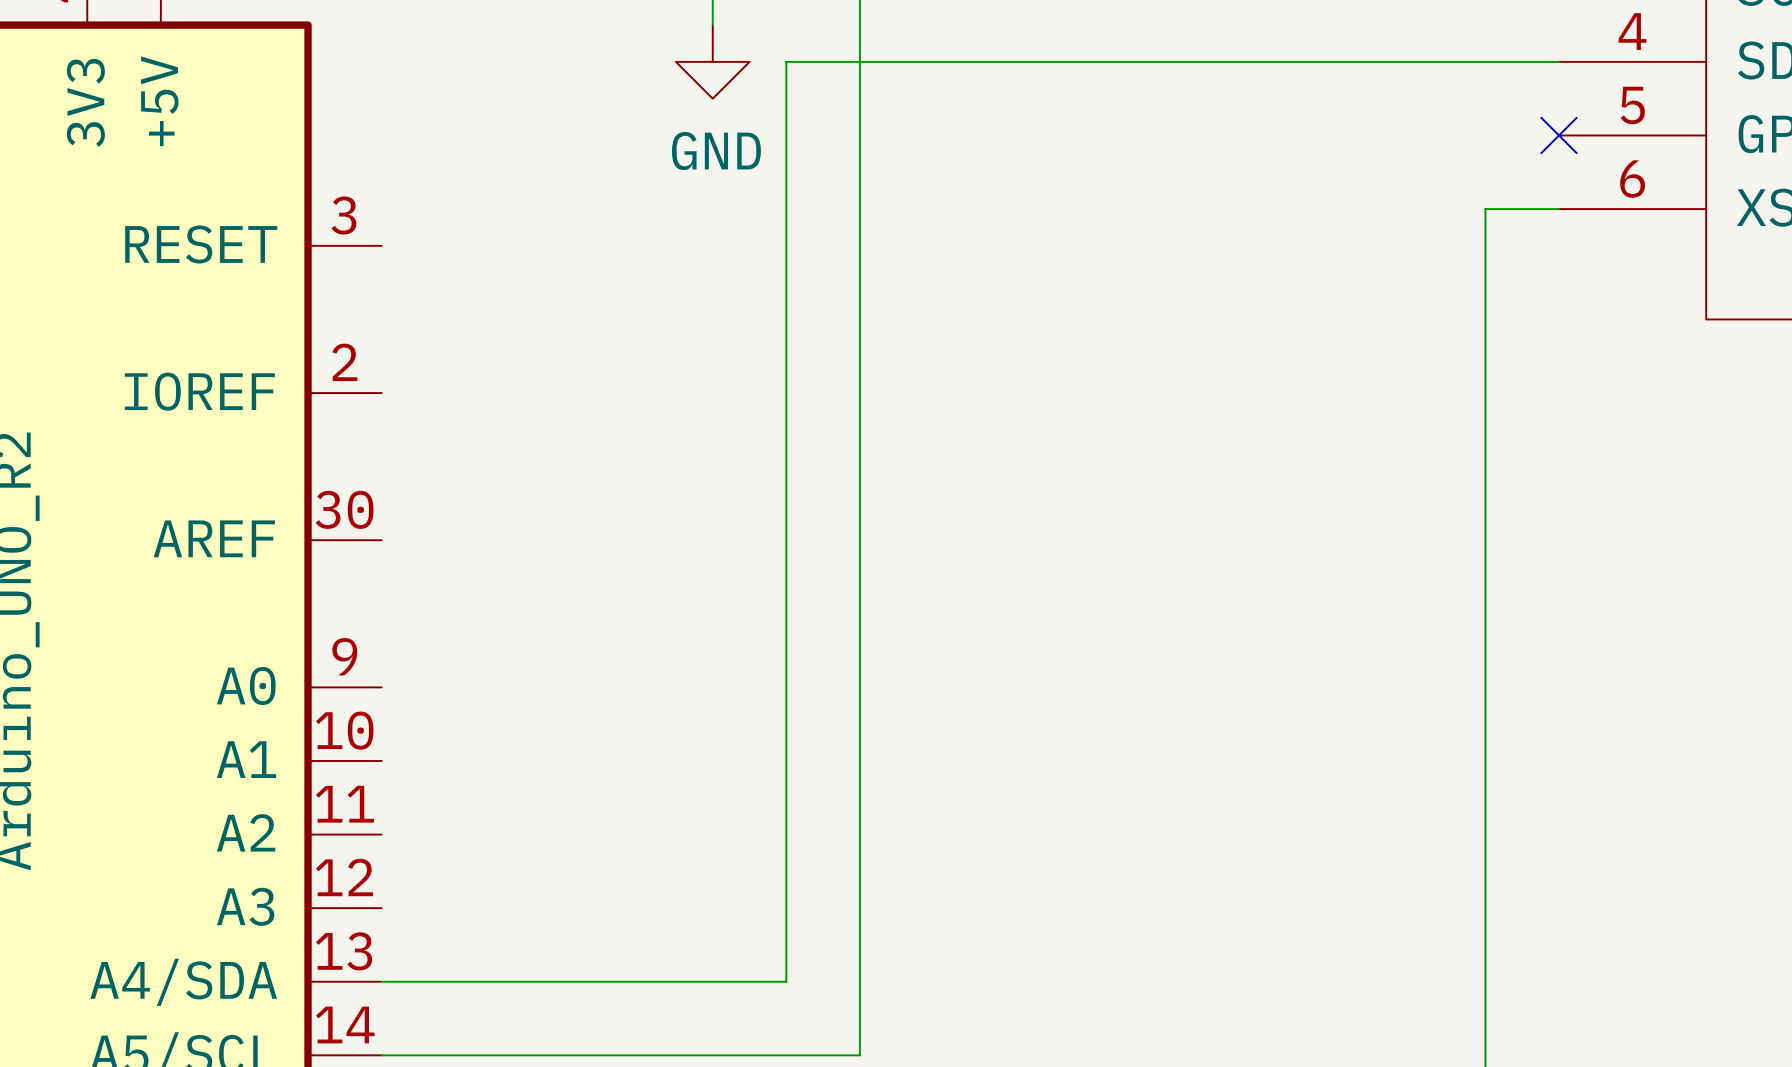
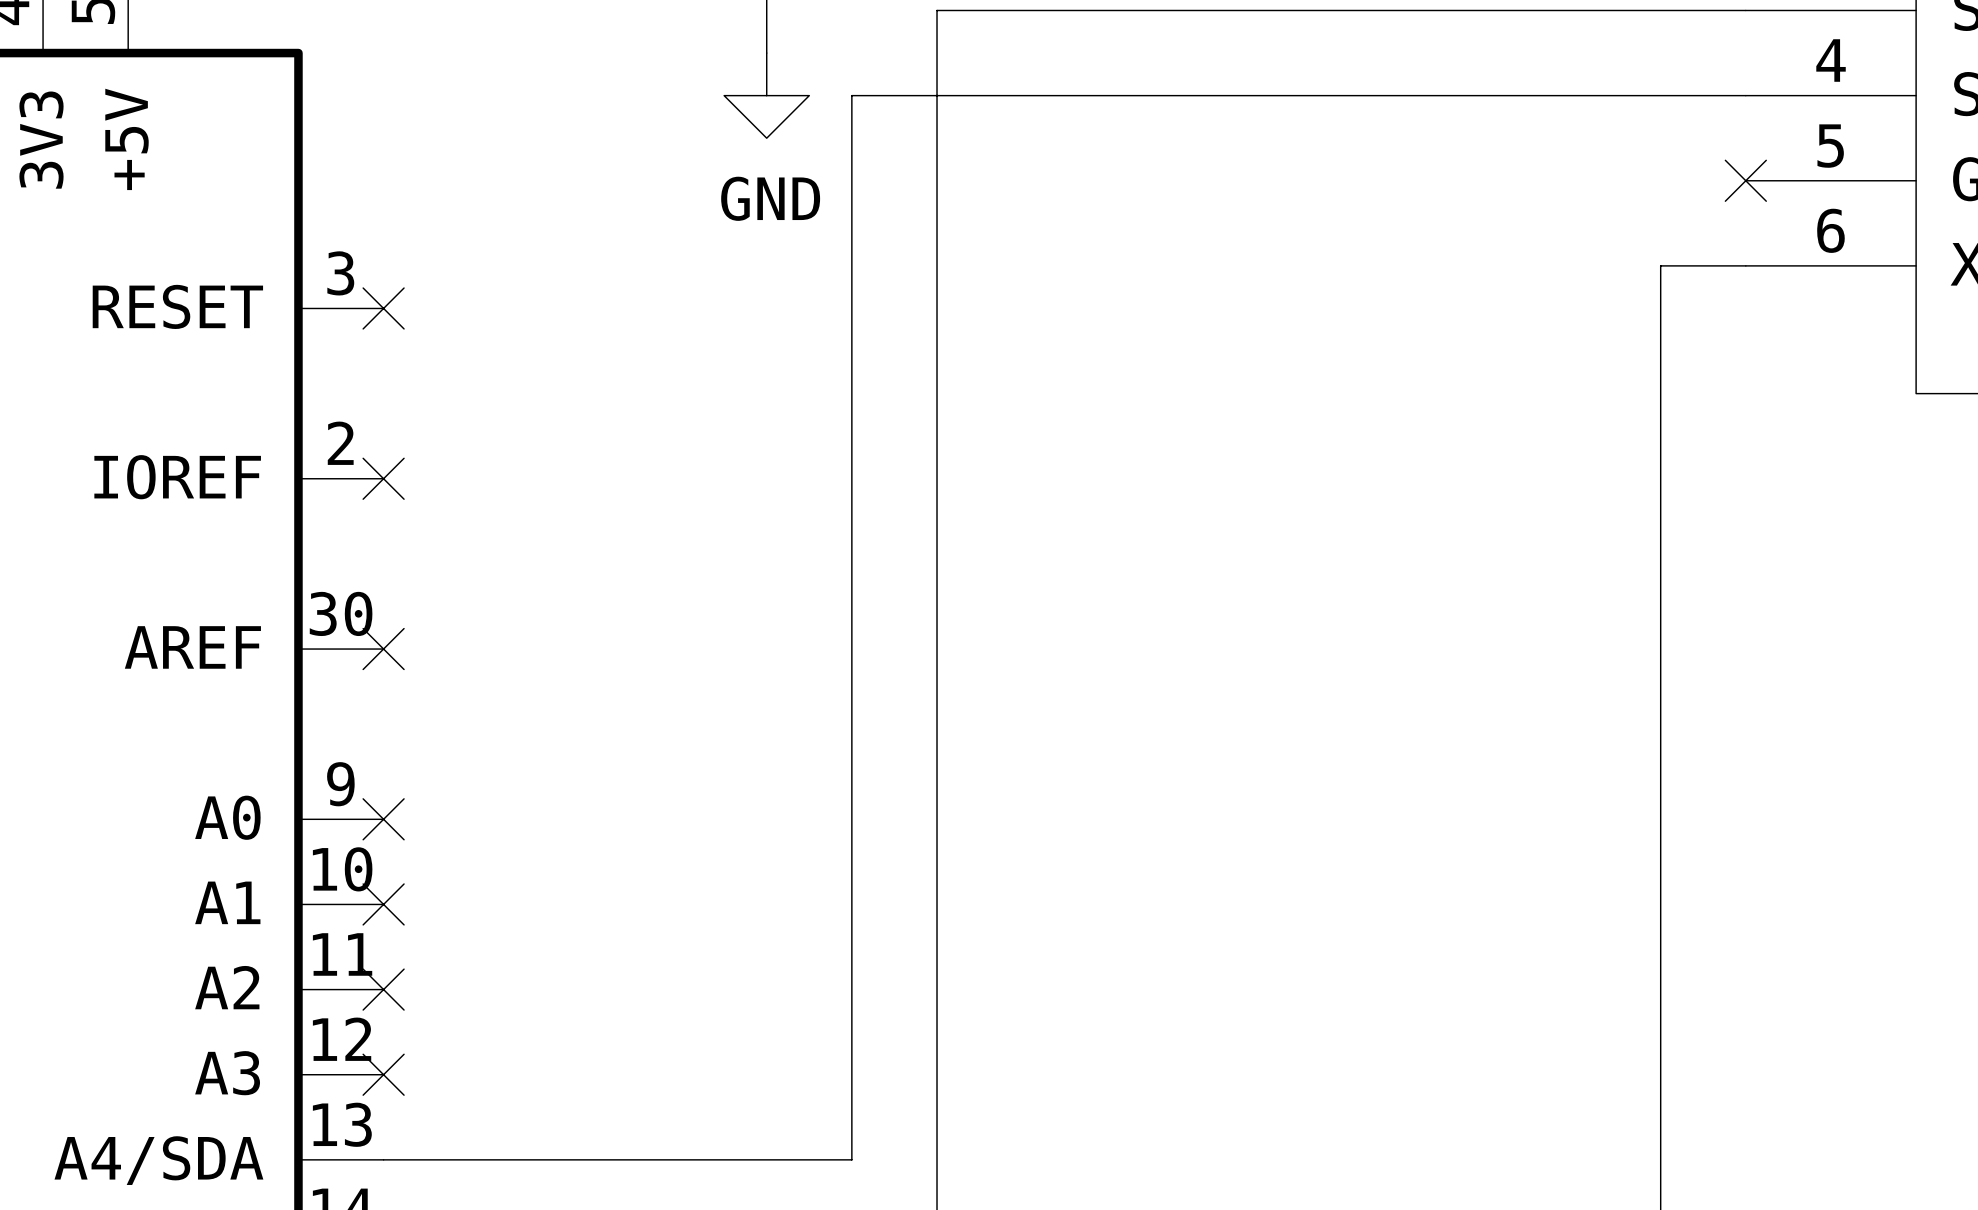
no-connect mark: none -> (383, 308)
no-connect mark: none -> (383, 478)
no-connect mark: none -> (383, 649)
no-connect mark: none -> (383, 819)
no-connect mark: none -> (383, 904)
no-connect mark: none -> (383, 989)
no-connect mark: none -> (383, 1074)

